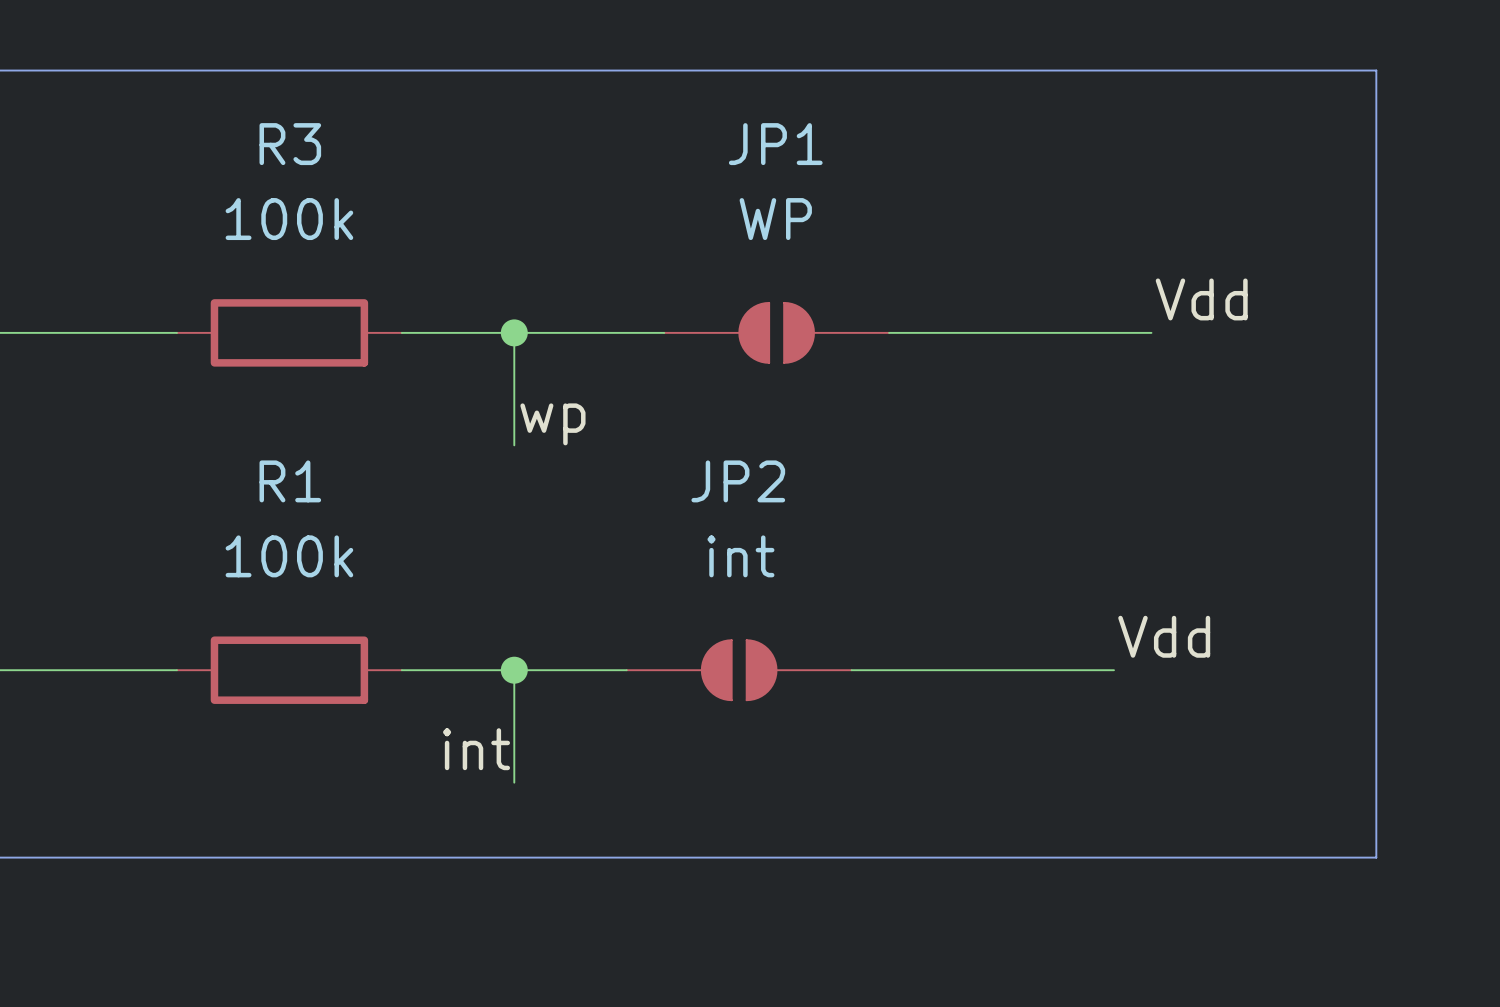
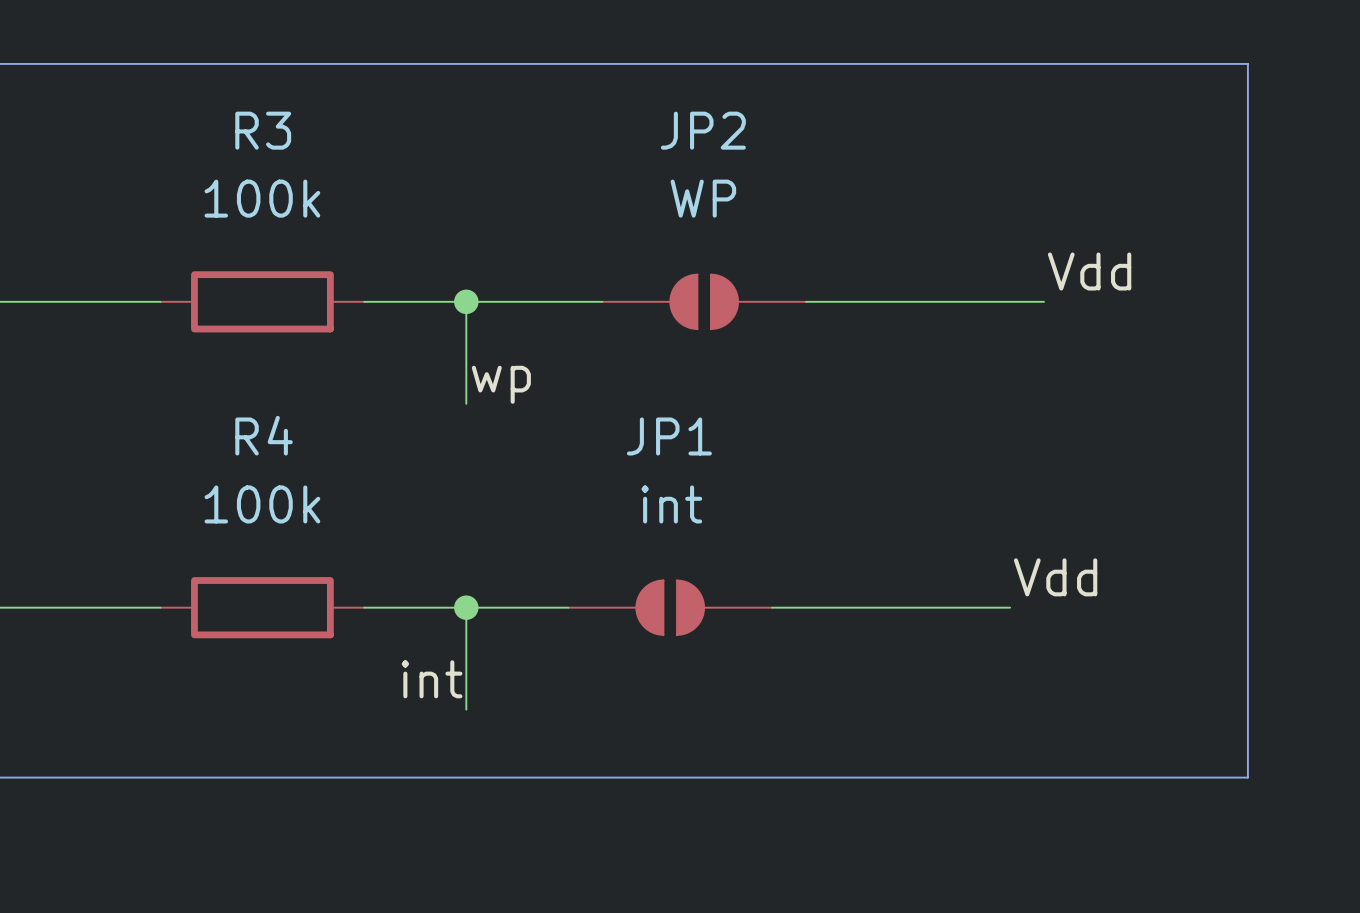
JP1 name: JP1 (775, 144) -> JP2 (703, 130)
R1 name: R1 (290, 481) -> R4 (264, 435)
JP2 name: JP2 (738, 481) -> JP1 (669, 436)

